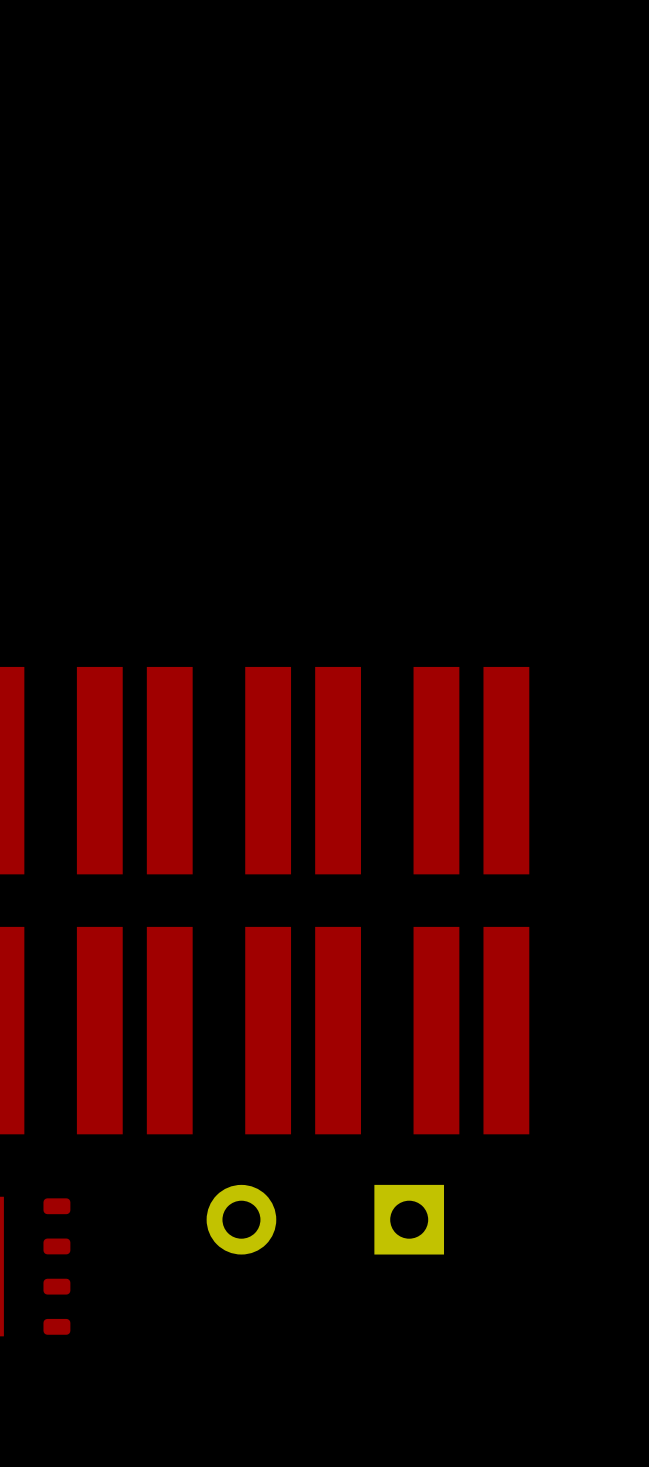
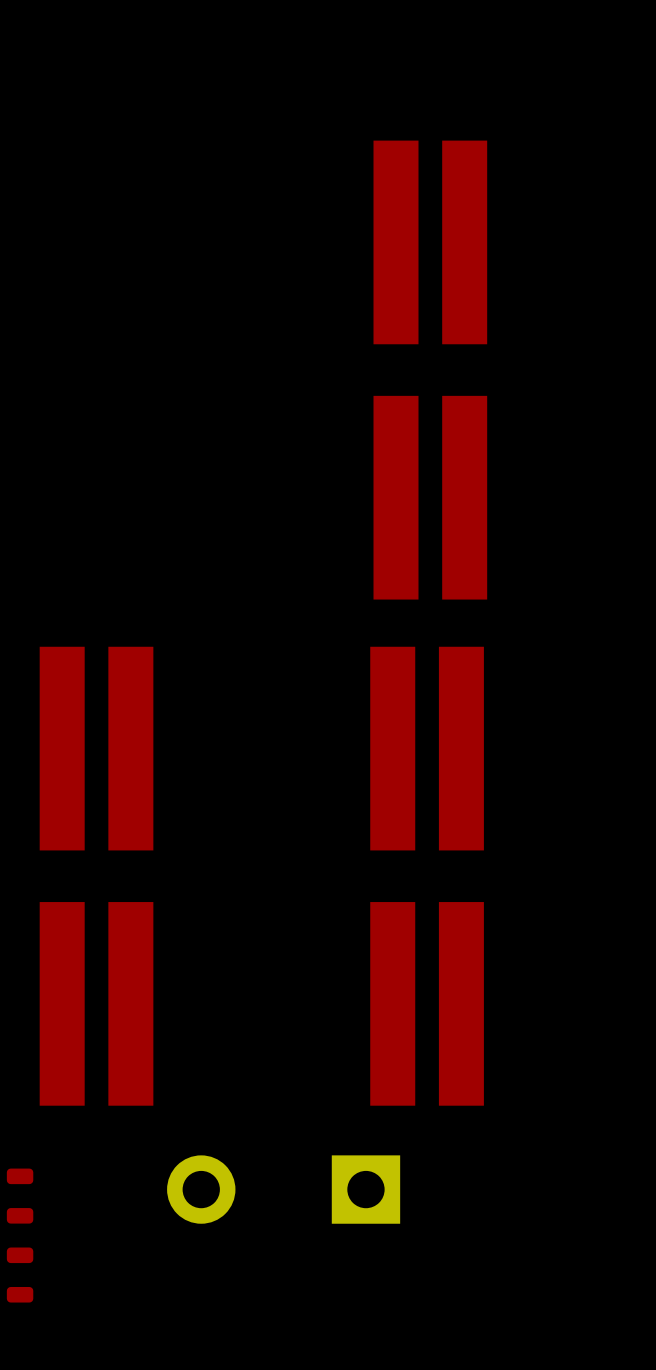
part: none -> (430, 242)
part: none -> (430, 497)
part: (303, 770) -> none
part: (303, 1030) -> none

